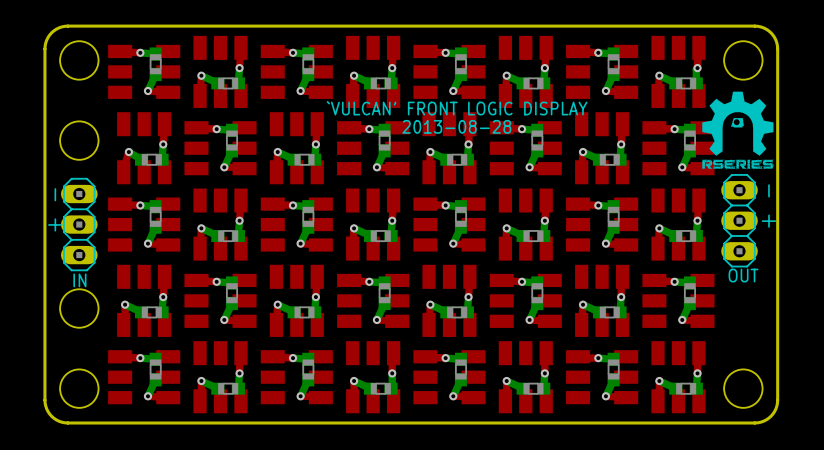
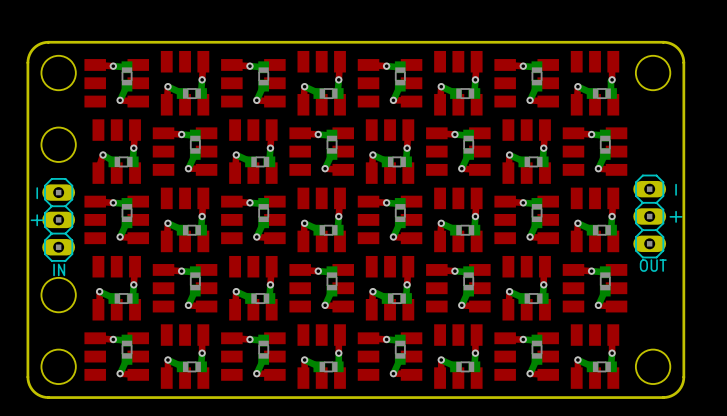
drawing: [701, 91, 774, 170] -> none
text: `VULCAN' FRONT LOGIC DISPLAY (457, 108) -> none
text: 2013-08-28 (456, 126) -> none

